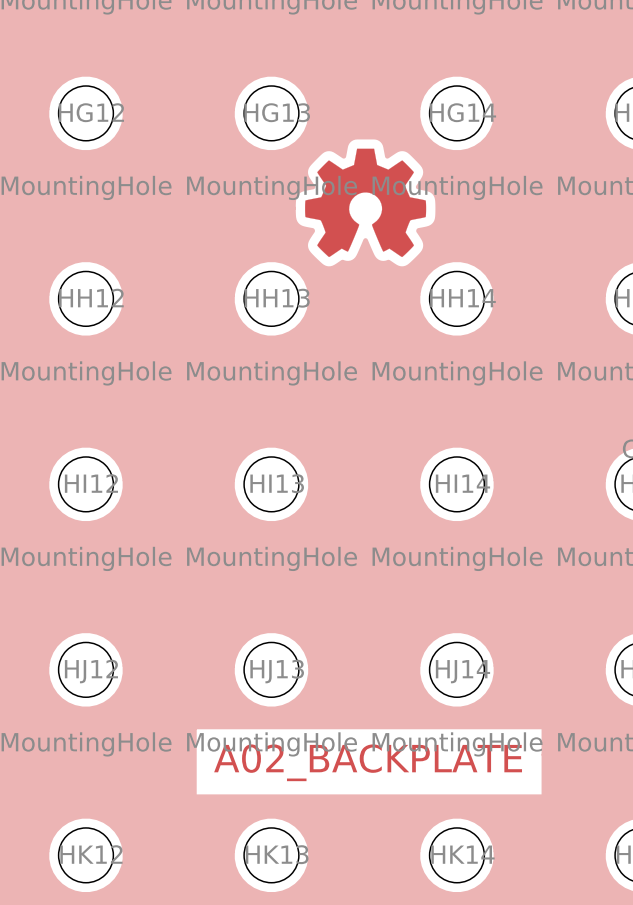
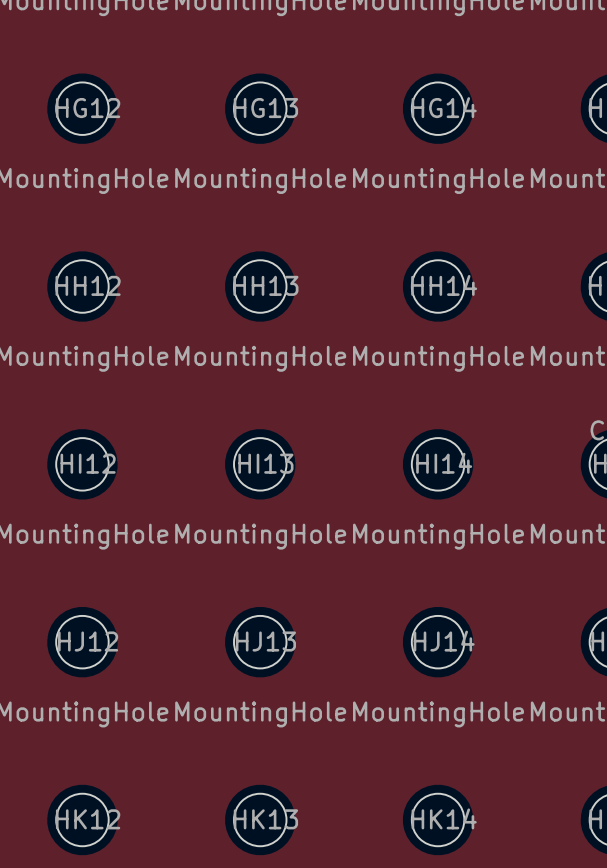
drawing: [305, 148, 427, 258] -> none
text: A02_BACKPLATE (368, 762) -> none

